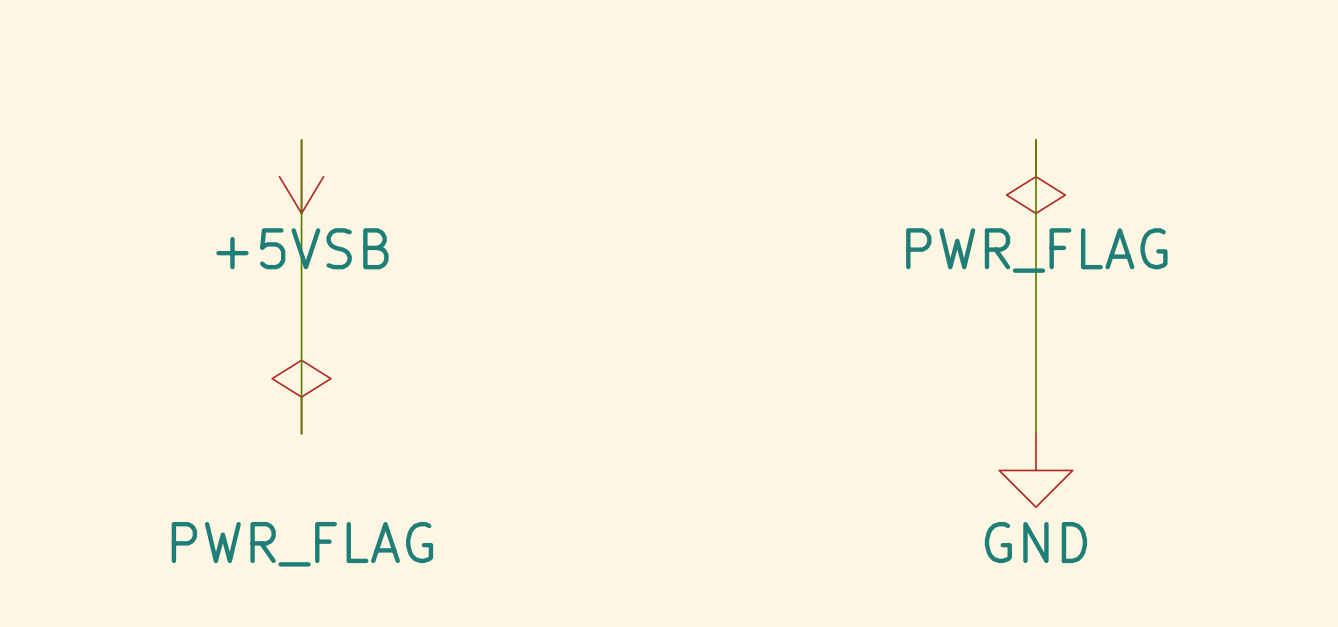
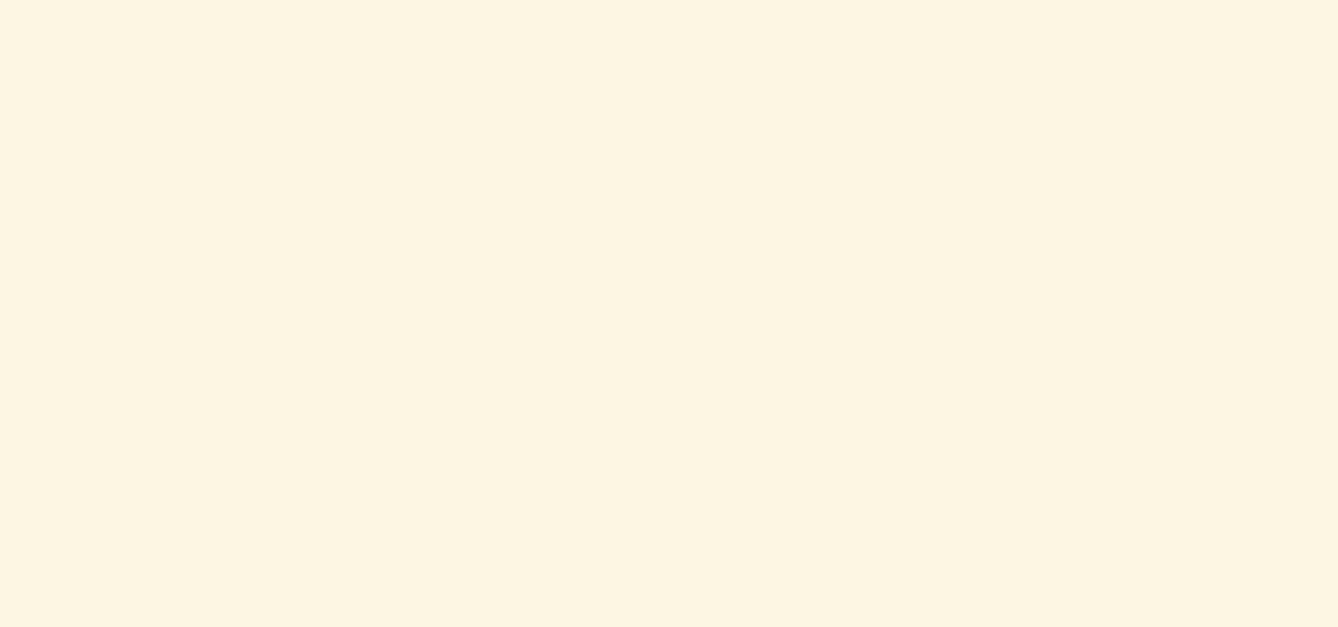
wire: (301, 139) (301, 433) -> none
wire: (1035, 139) (1035, 433) -> none
power symbol: +5VSB (301, 176) -> none
power symbol: PWR_FLAG (1035, 176) -> none
power symbol: PWR_FLAG (301, 397) -> none
power symbol: GND (1035, 470) -> none

